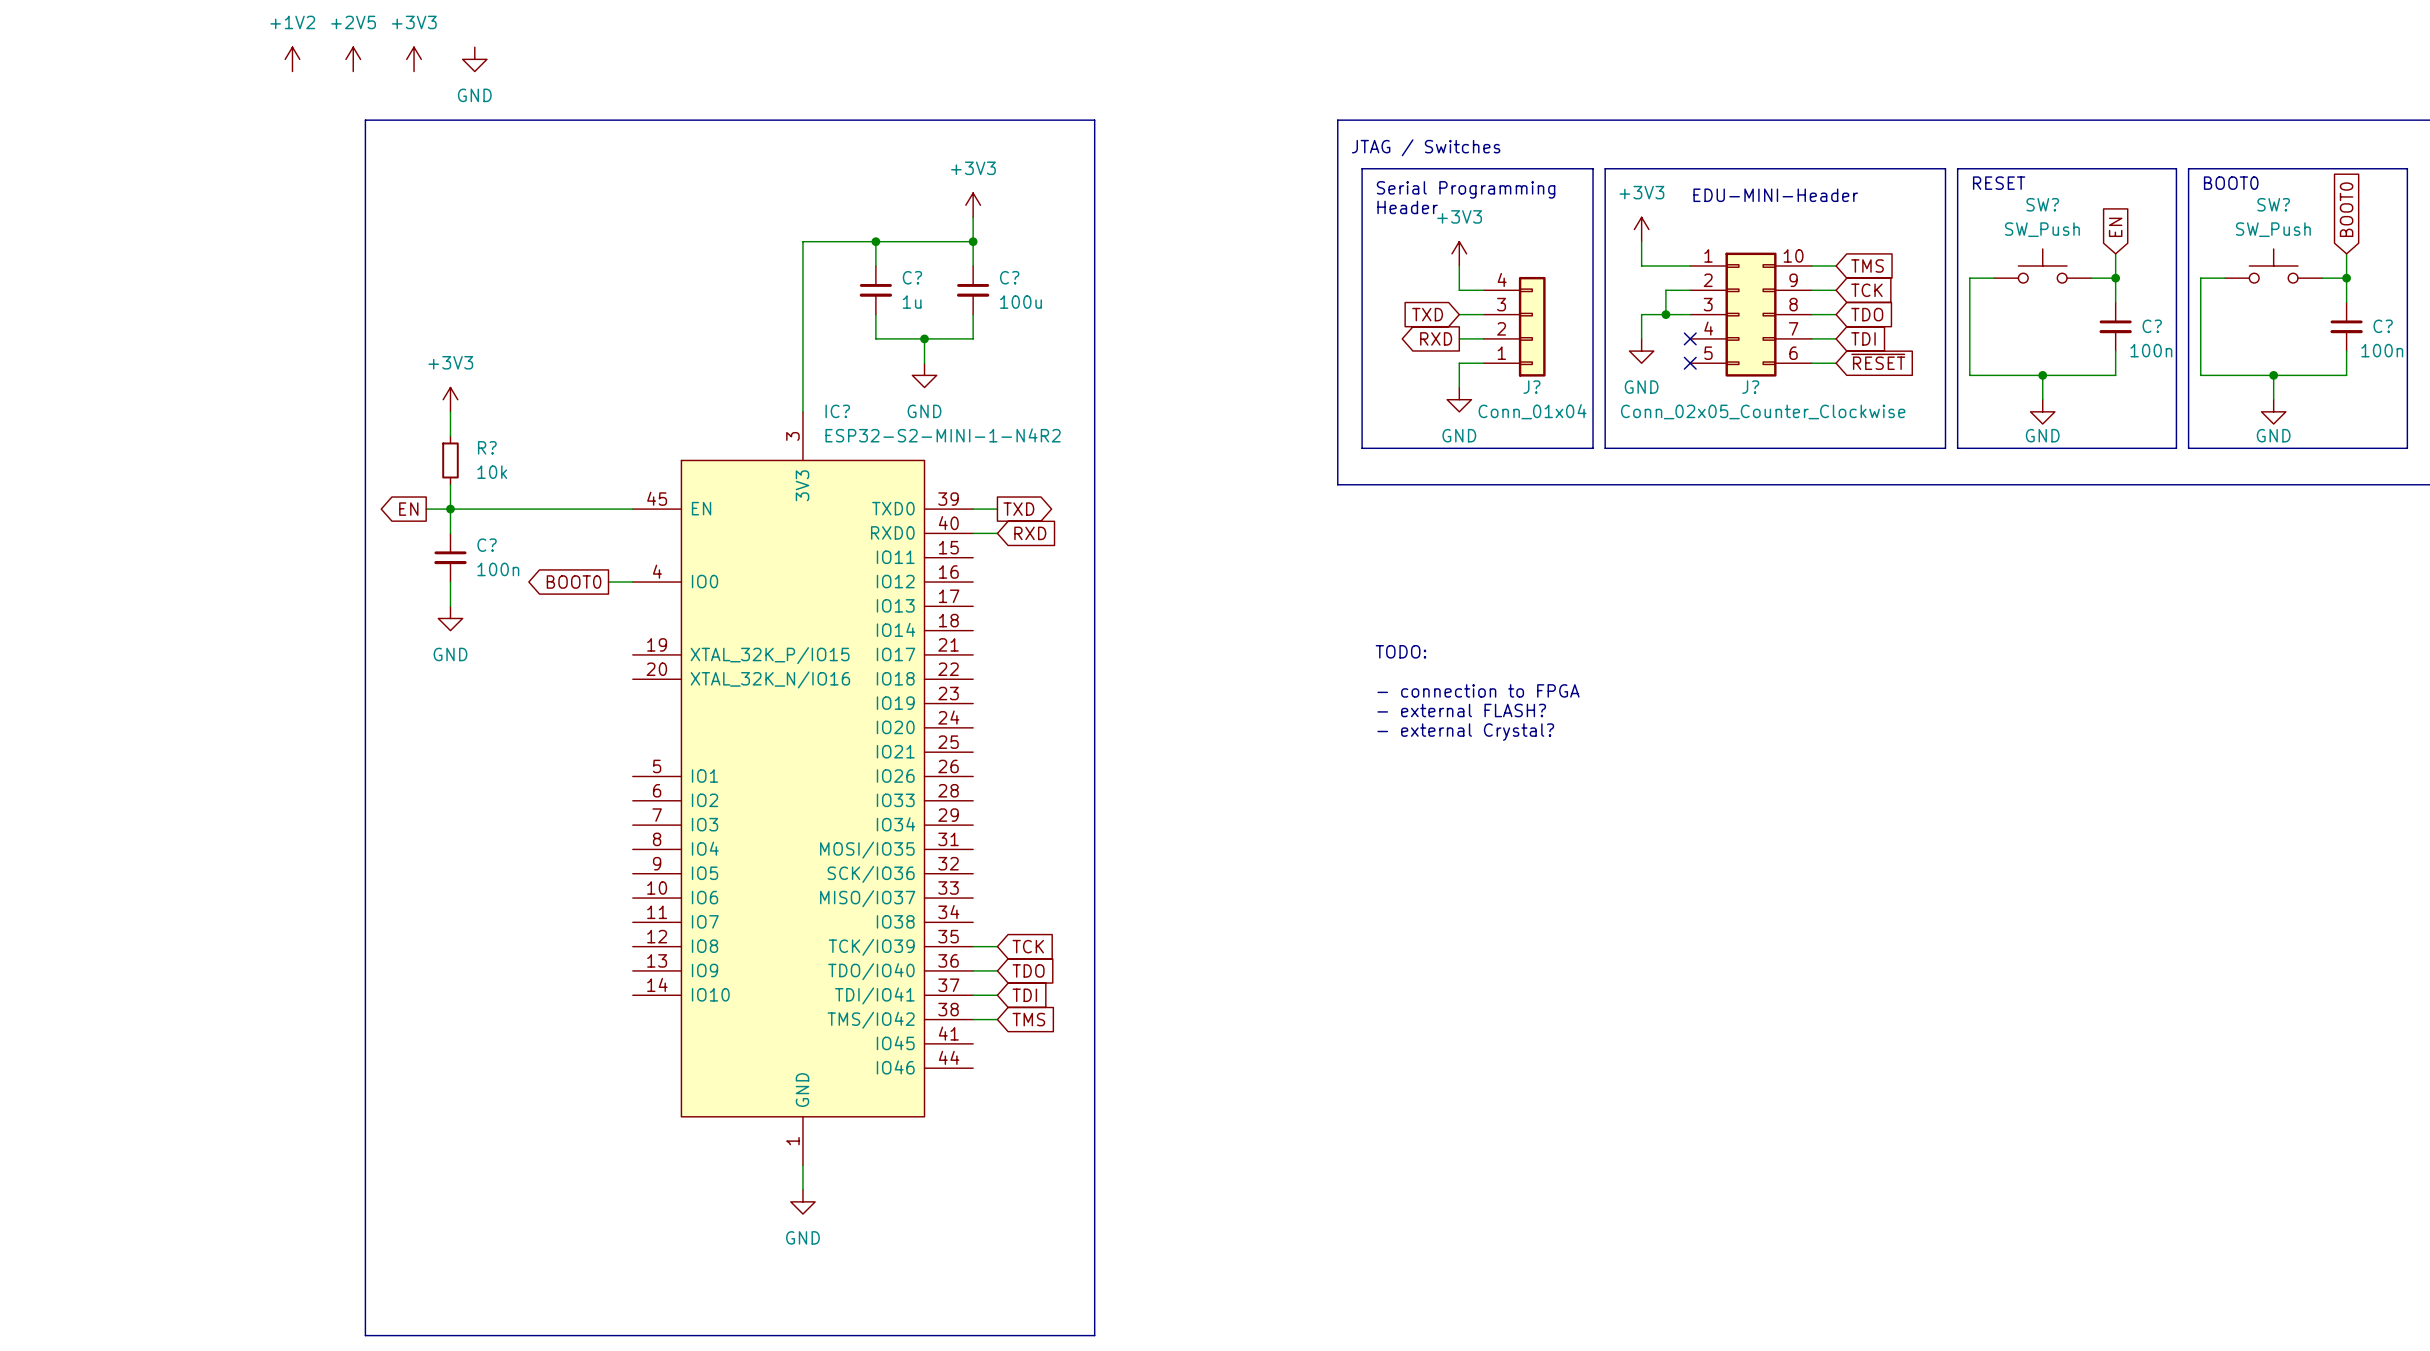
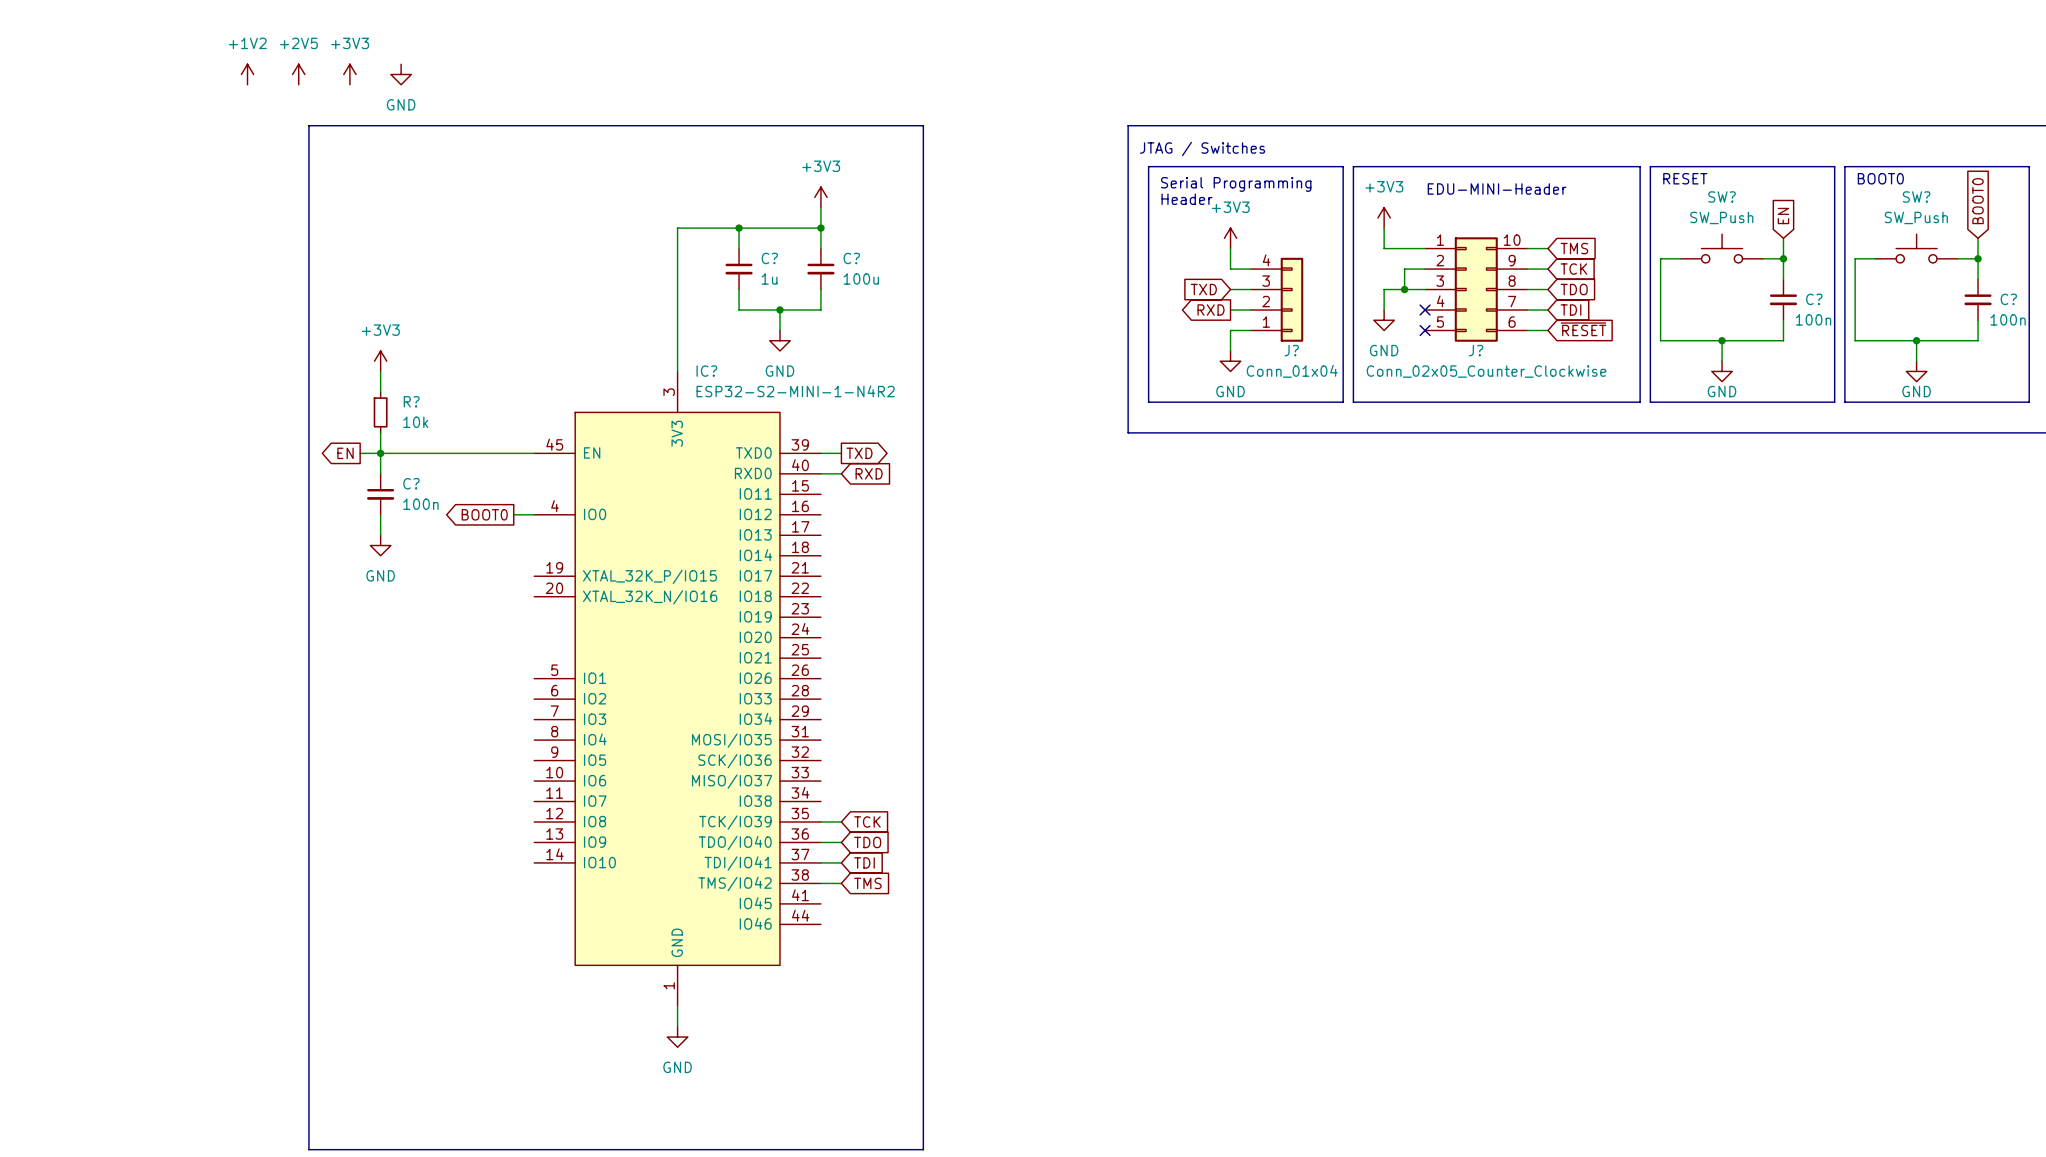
text: TODO: (1400, 651) -> none
text: - connection to FPGA (1478, 690) -> none
text: - external FLASH? (1461, 710) -> none
text: - external Crystal? (1465, 732) -> none

